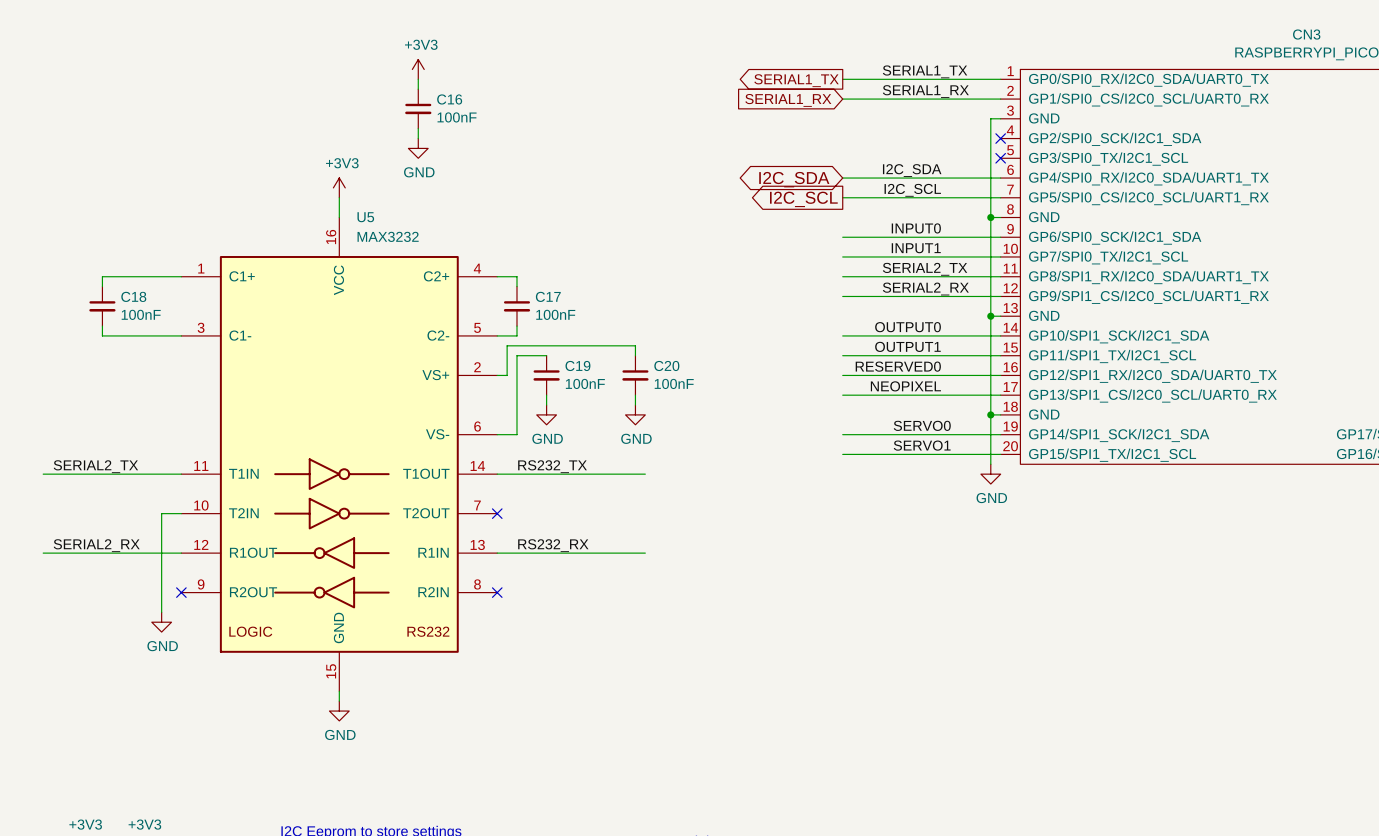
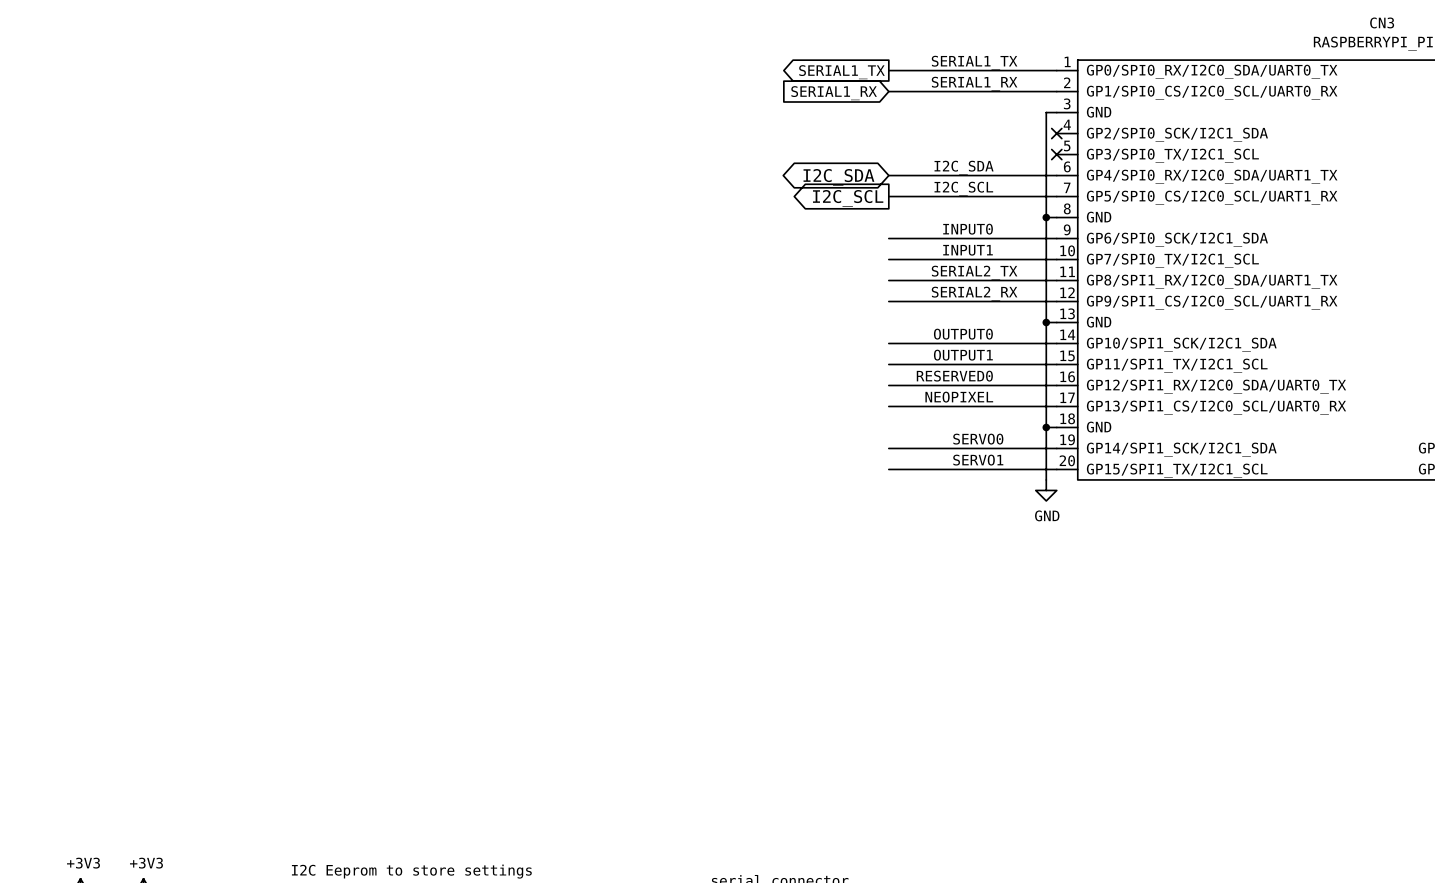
power symbol: +3V3 (418, 69) -> none
wire: (418, 79) (418, 89) -> none
C16: 100nF (418, 108) -> none
wire: (418, 128) (418, 138) -> none
power symbol: GND (418, 148) -> none
power symbol: +3V3 (339, 187) -> none
wire: (339, 197) (339, 217) -> none
wire: (181, 276) (102, 276) (102, 286) -> none
wire: (497, 276) (516, 276) (516, 286) -> none
C18: 100nF (102, 306) -> none
C17: 100nF (516, 306) -> none
wire: (102, 326) (102, 335) (181, 335) -> none
wire: (516, 326) (516, 335) (497, 335) -> none
wire: (546, 355) (516, 355) (516, 434) (497, 434) -> none
wire: (635, 355) (635, 345) (507, 345) (507, 375) (497, 375) -> none
C19: 100nF (546, 375) -> none
C20: 100nF (635, 375) -> none
wire: (546, 395) (546, 405) -> none
wire: (635, 395) (635, 405) -> none
power symbol: GND (546, 414) -> none
power symbol: GND (635, 414) -> none
U5: MAX3232 (339, 454) -> none
label: SERIAL2_TX (95, 466) -> none
label: RS232_TX (552, 466) -> none
wire: (43, 474) (181, 474) -> none
wire: (497, 474) (645, 474) -> none
wire: (181, 513) (161, 513) (161, 612) -> none
no-connect mark: (497, 513) -> none
label: SERIAL2_RX (96, 545) -> none
label: RS232_RX (553, 545) -> none
wire: (43, 553) (181, 553) -> none
wire: (497, 553) (645, 553) -> none
no-connect mark: (181, 592) -> none
no-connect mark: (497, 592) -> none
power symbol: GND (161, 622) -> none
wire: (339, 691) (339, 701) -> none
power symbol: GND (339, 711) -> none

